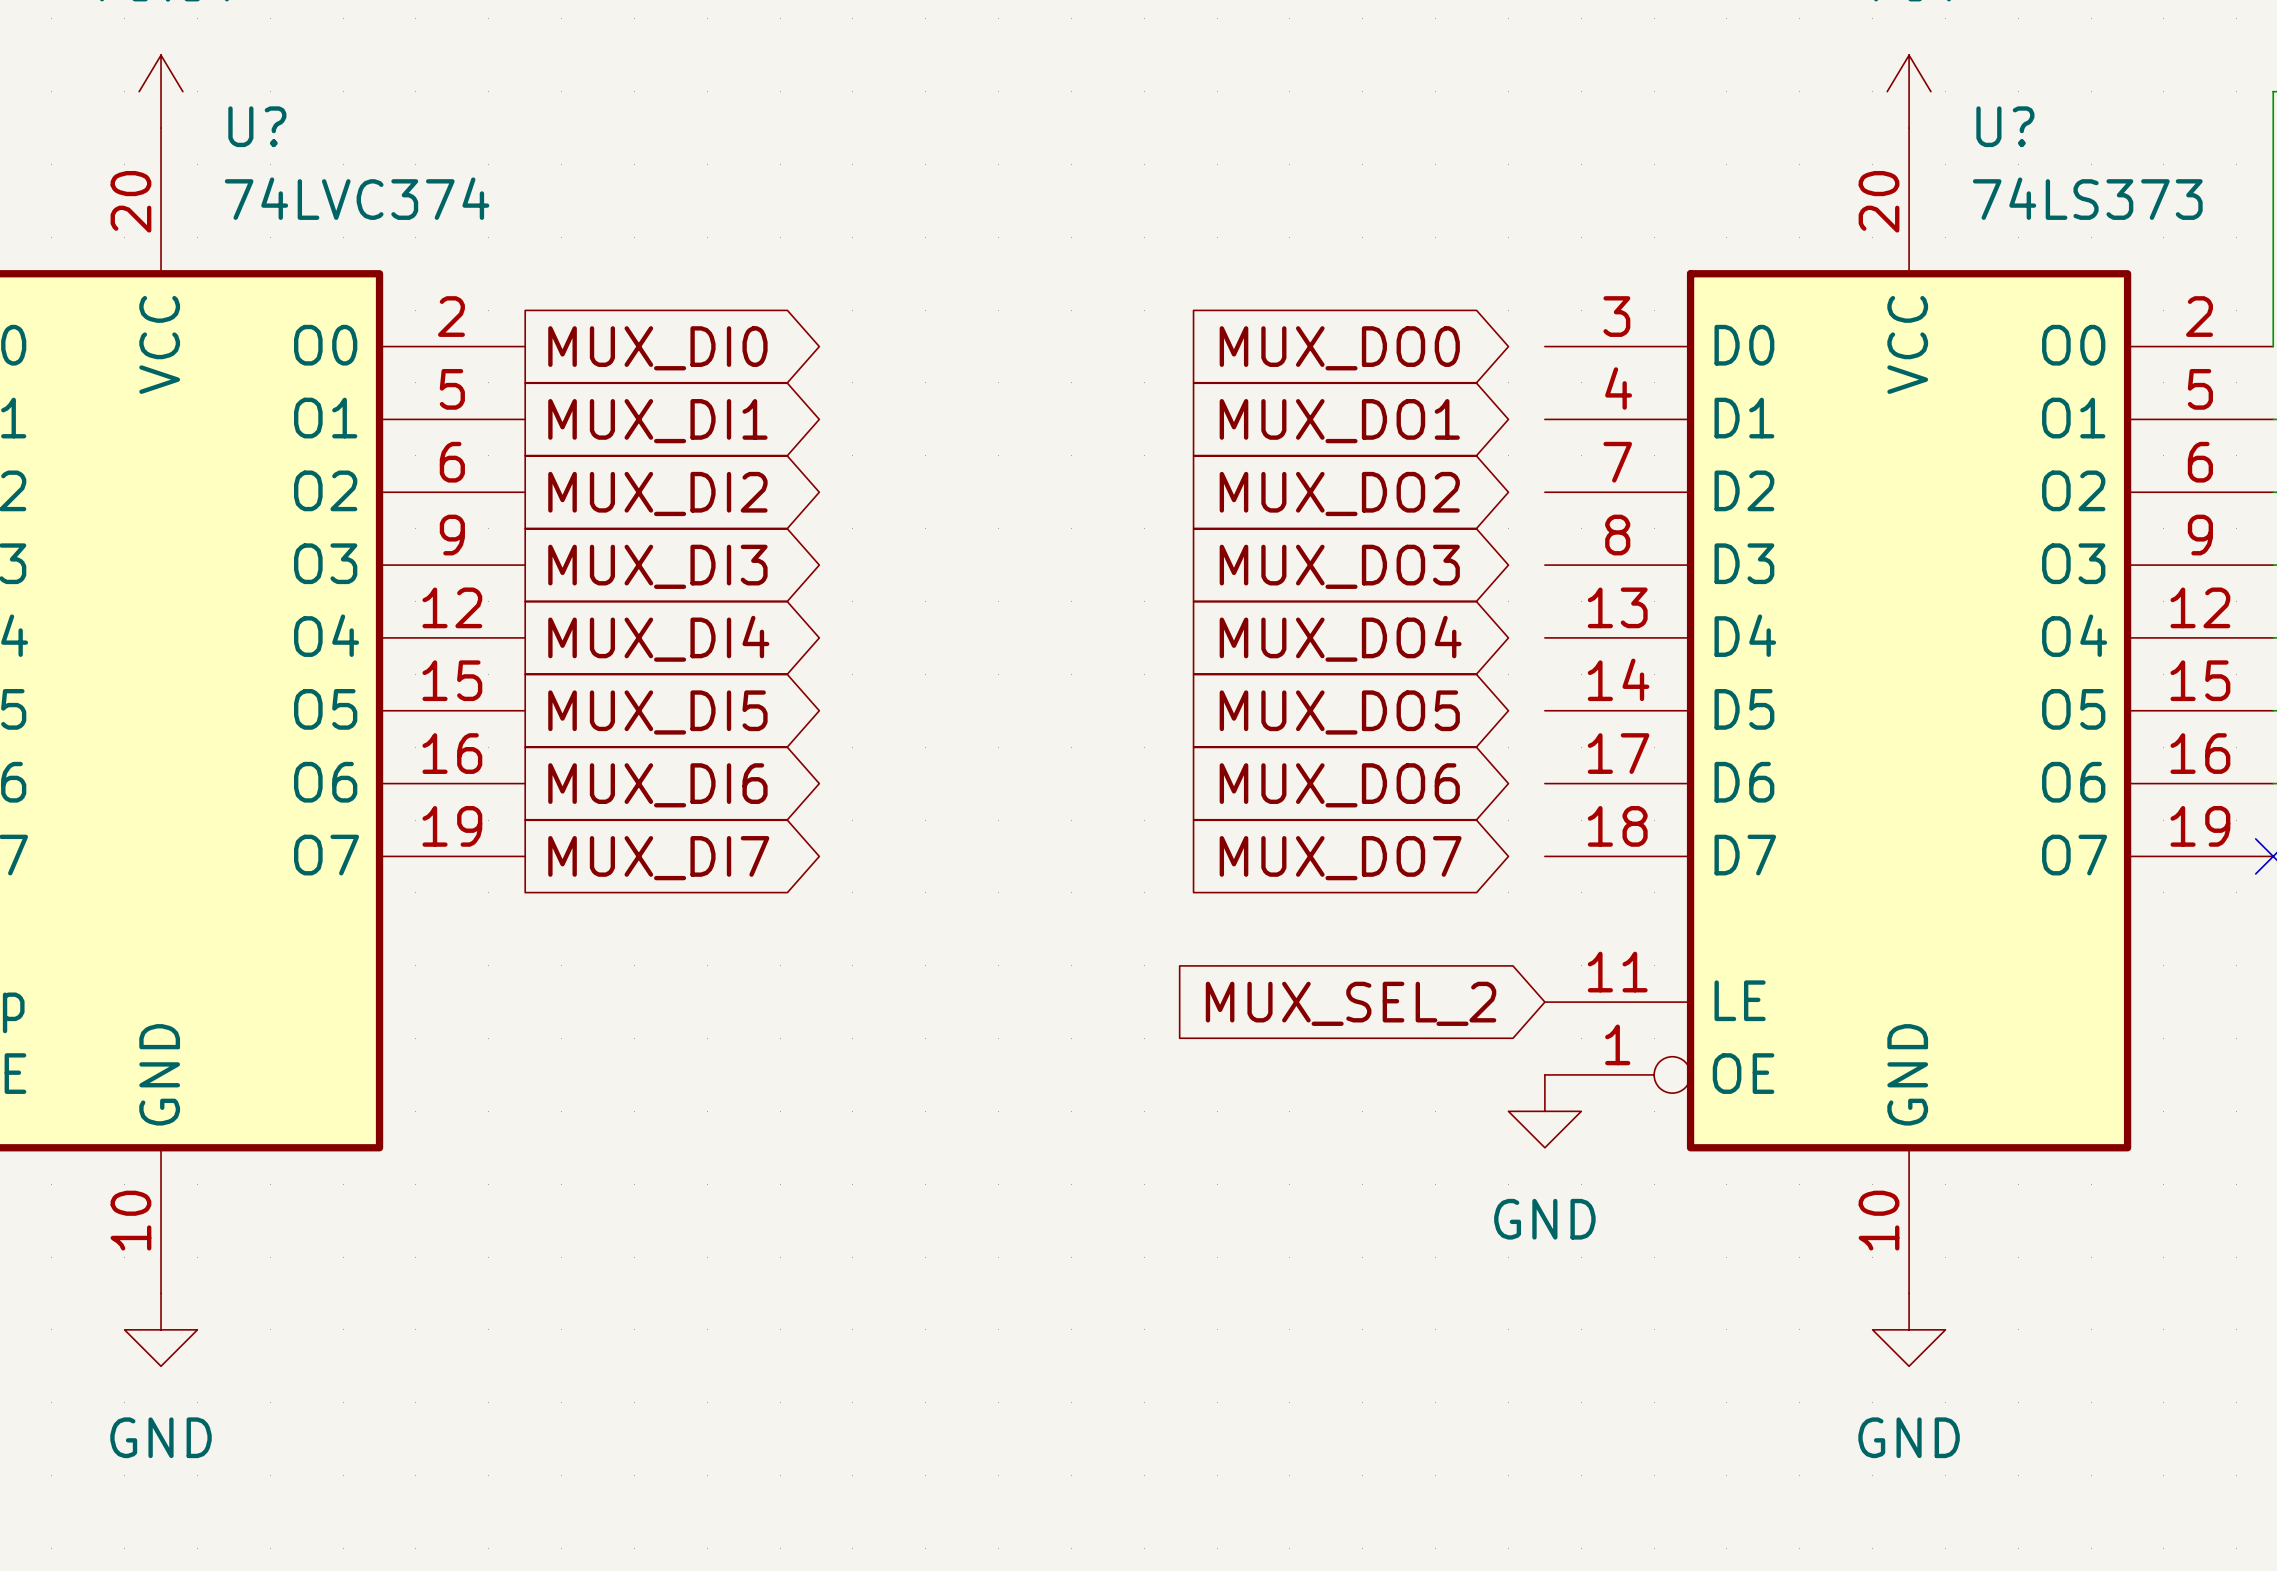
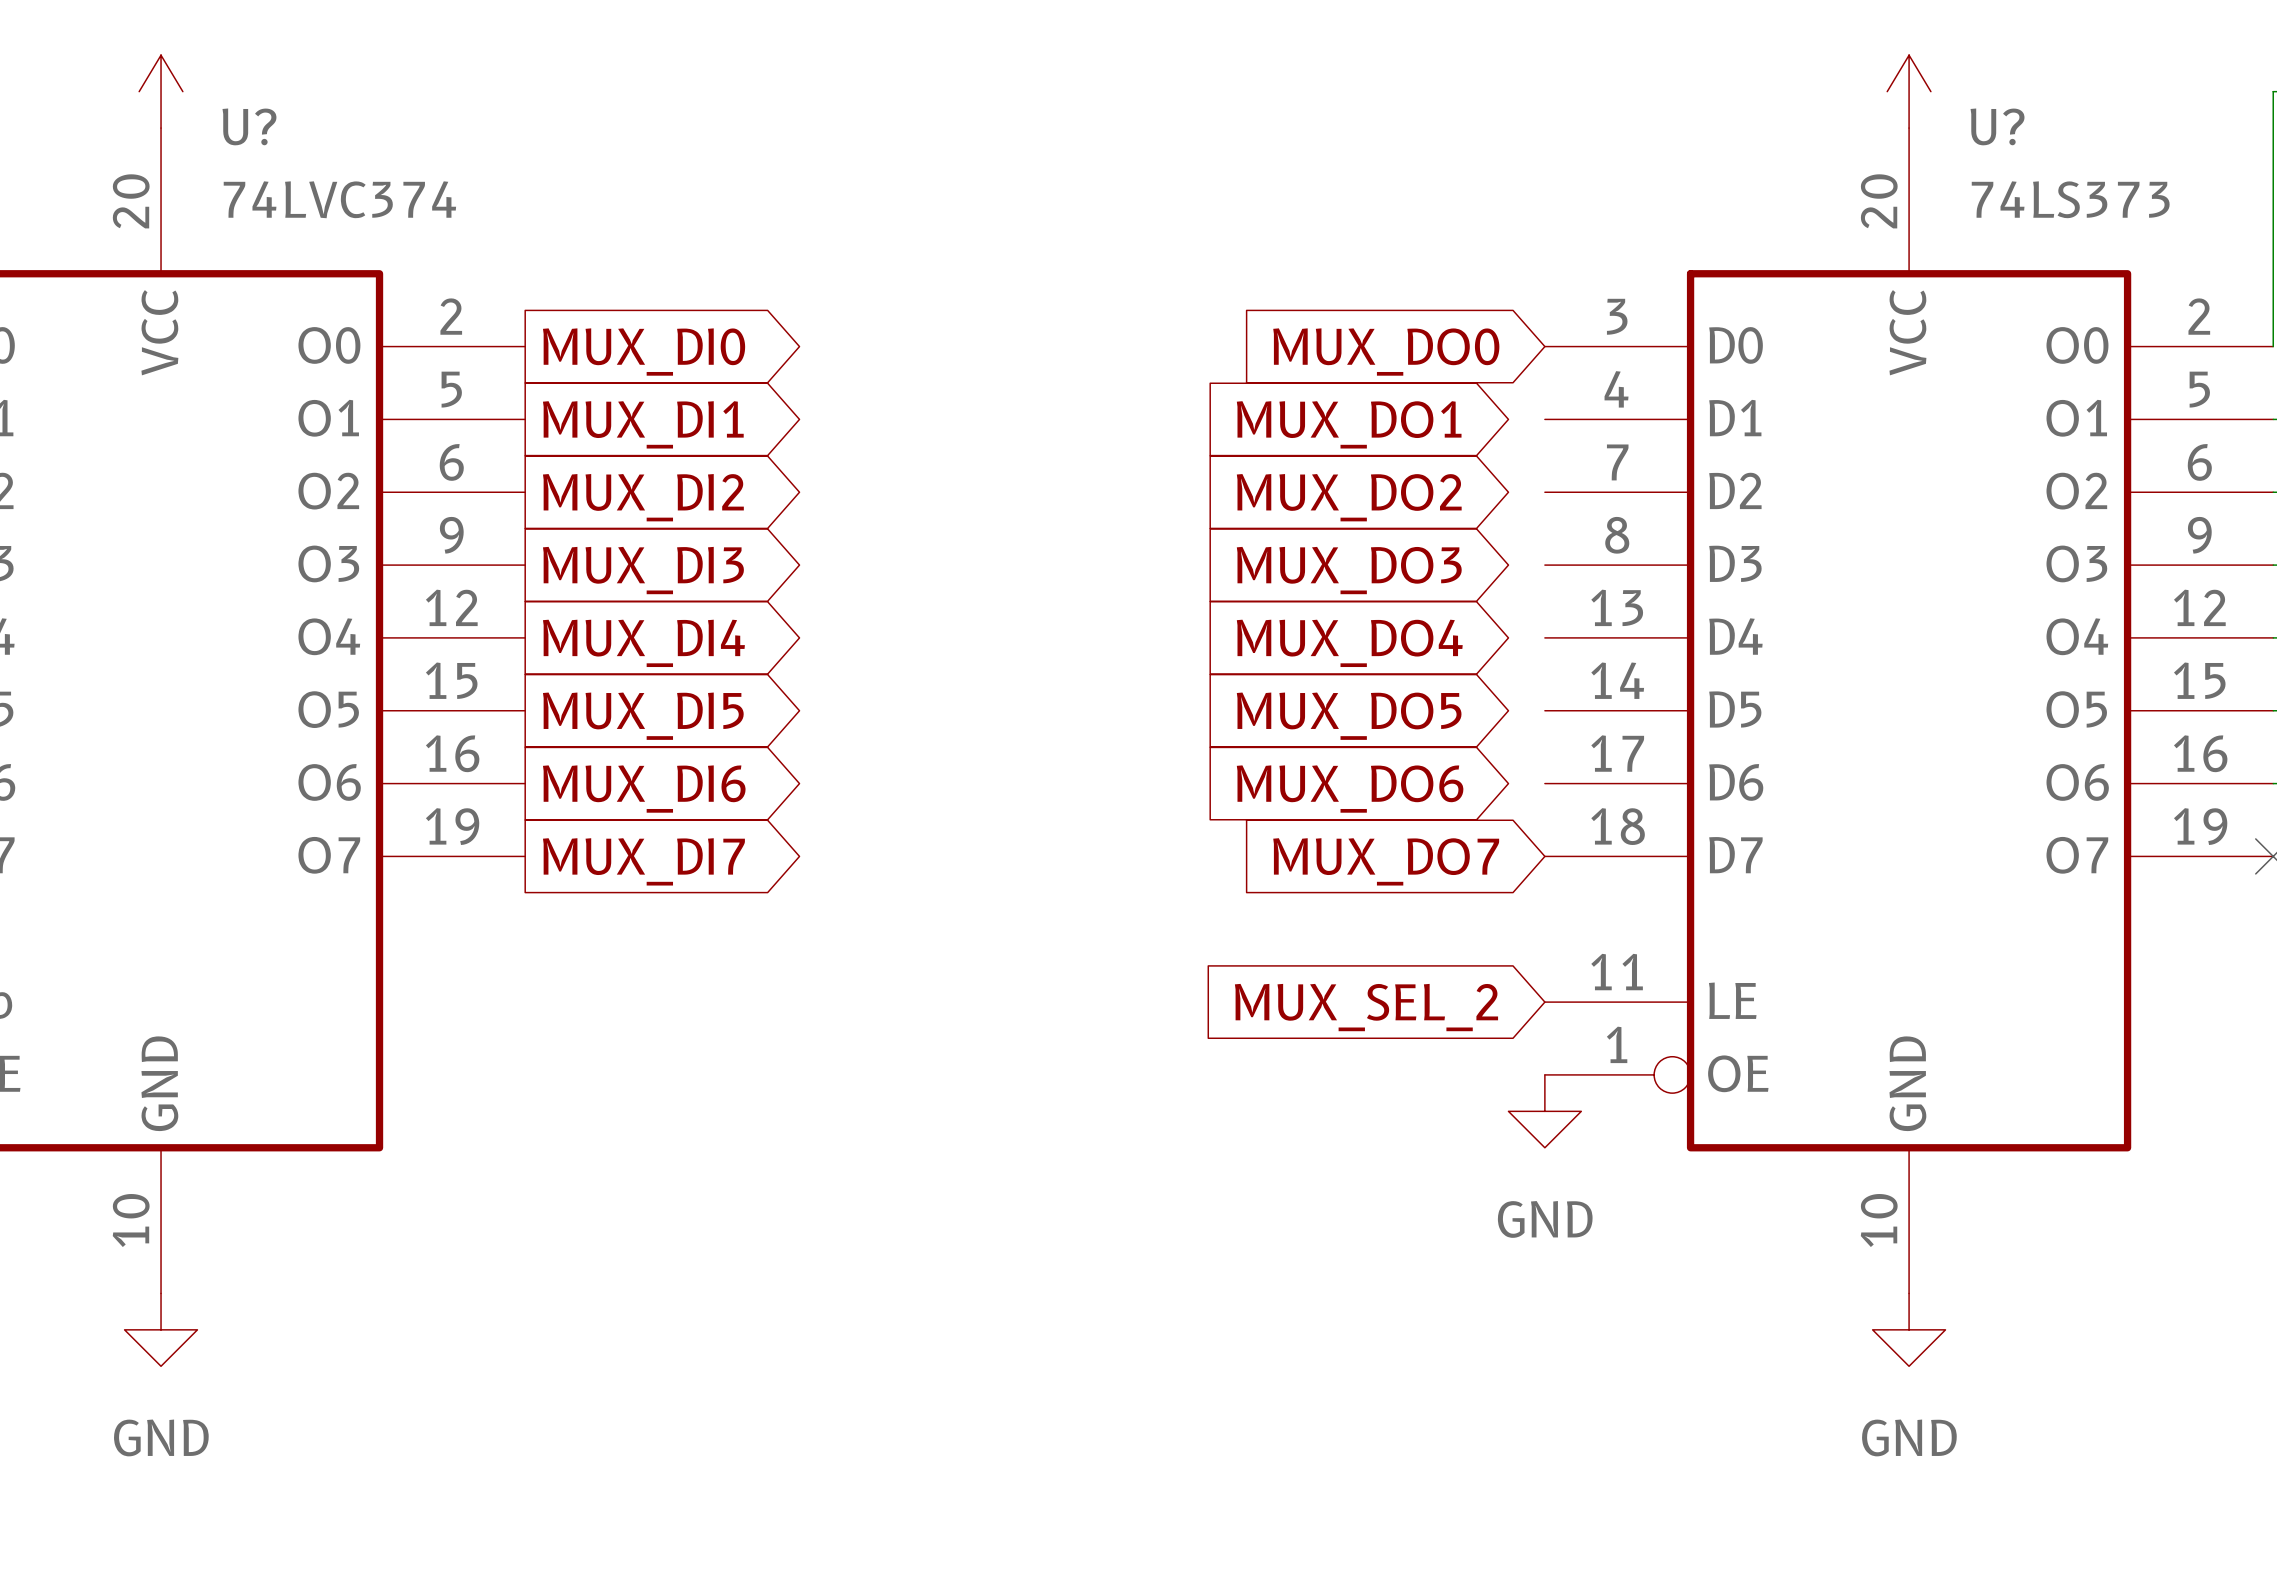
global label position: MUX_DO0 (1339, 348) -> MUX_DO0 (1386, 352)
global label position: MUX_DO7 (1340, 858) -> MUX_DO7 (1386, 861)

